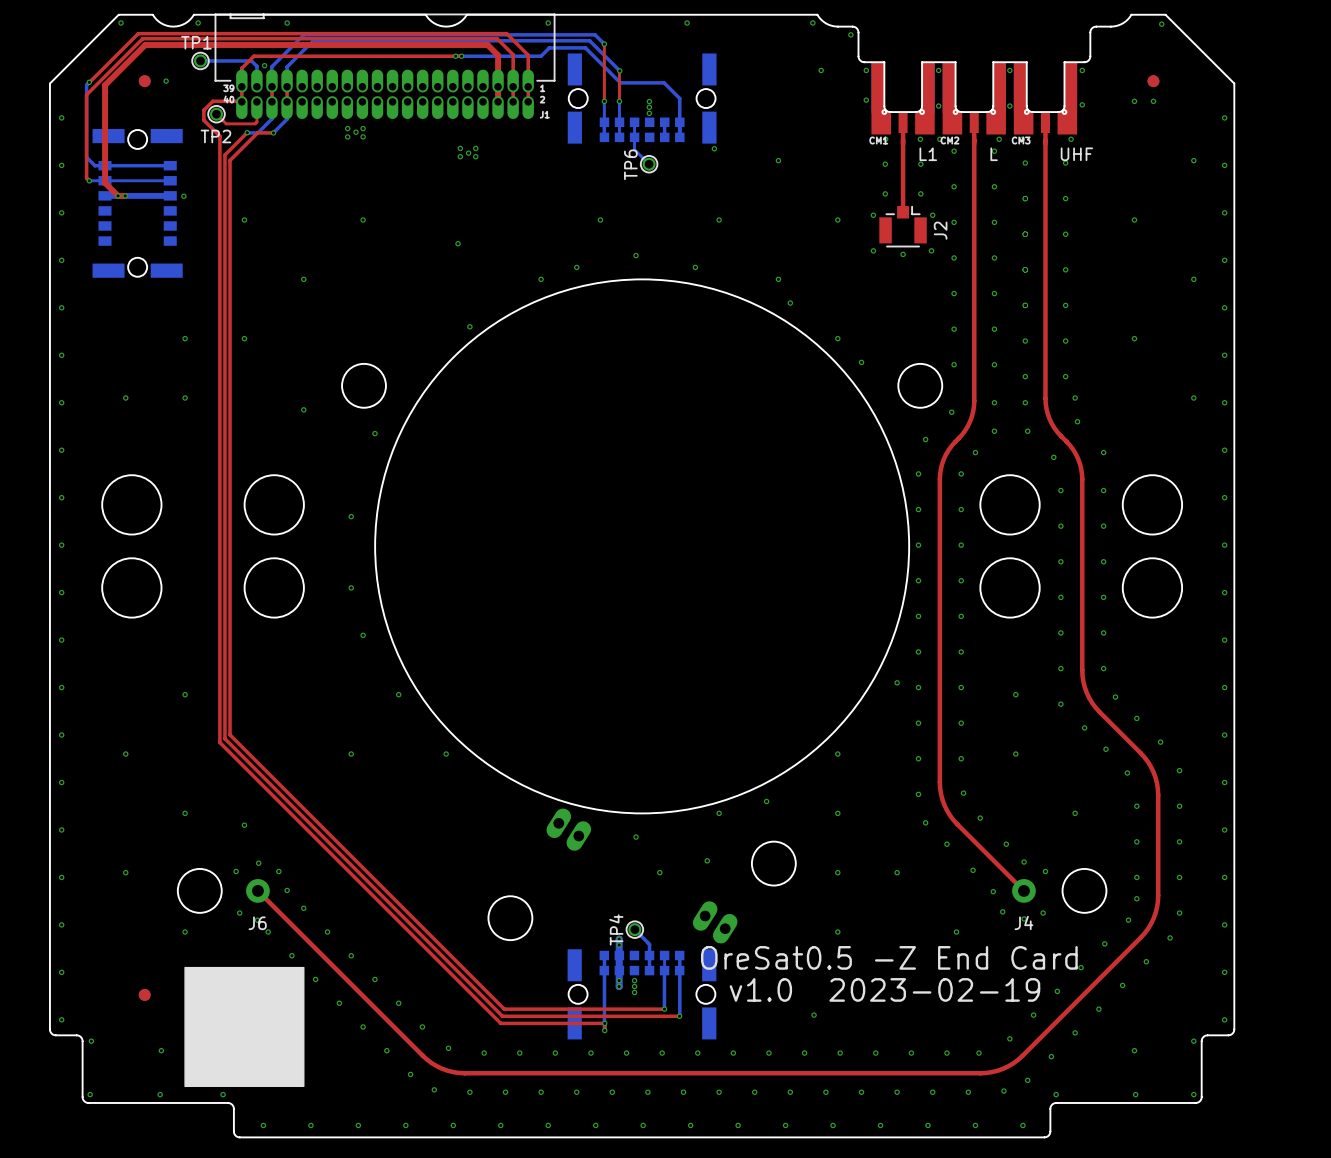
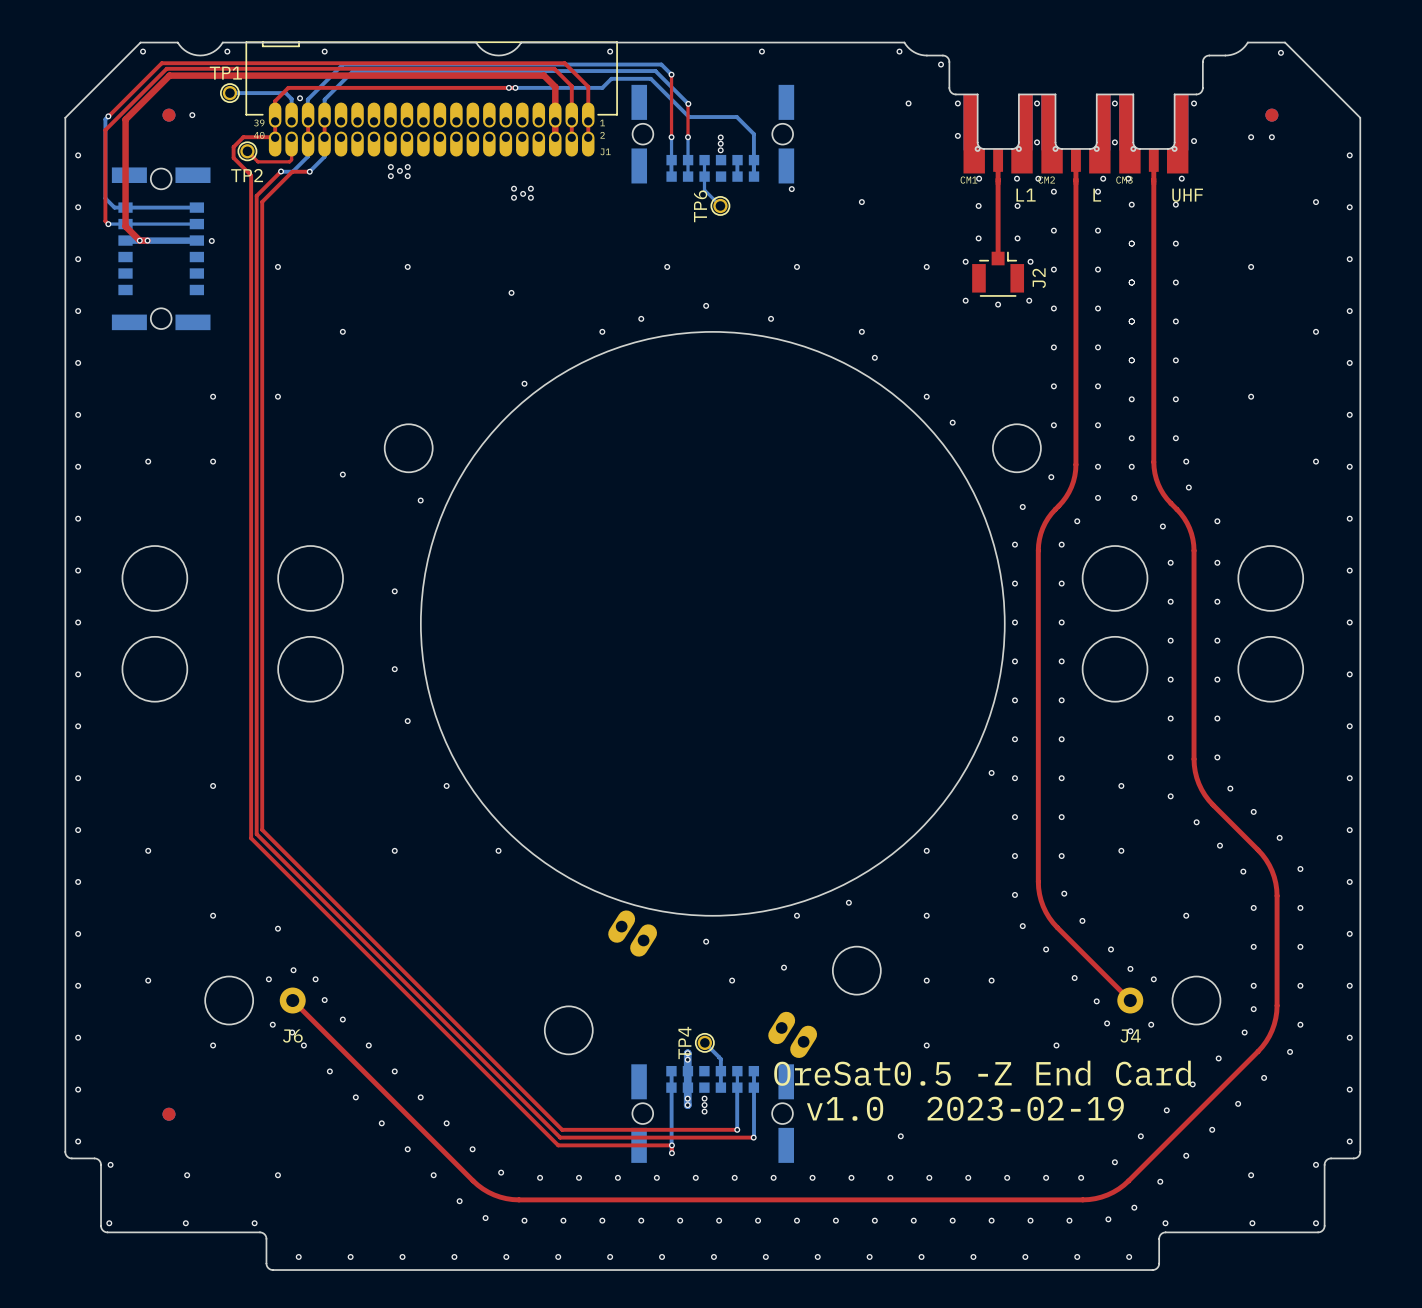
drawing: [184, 966, 305, 1088] -> none

